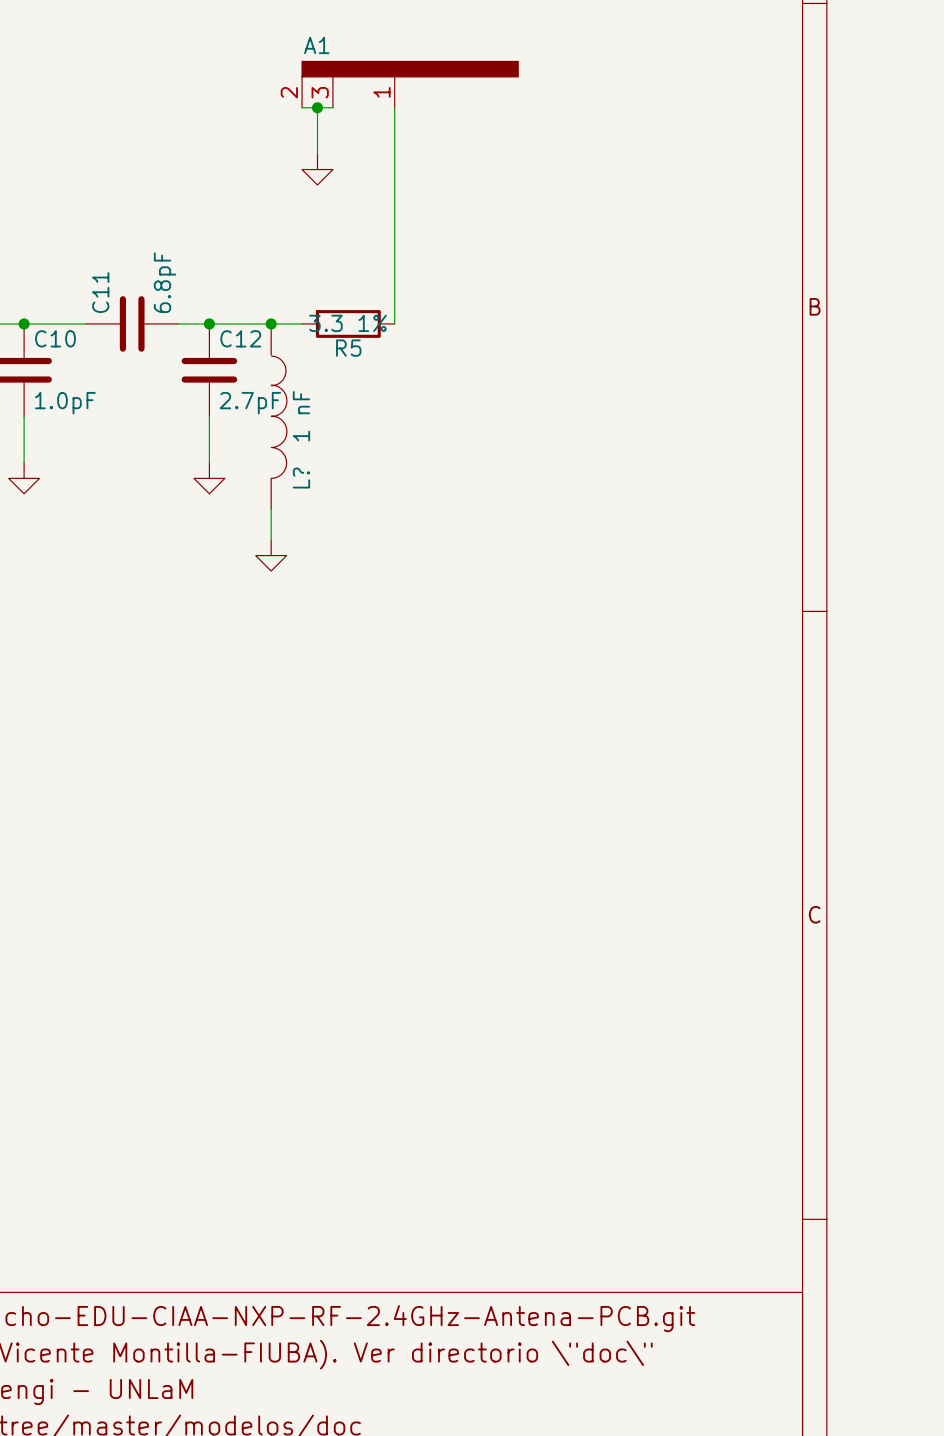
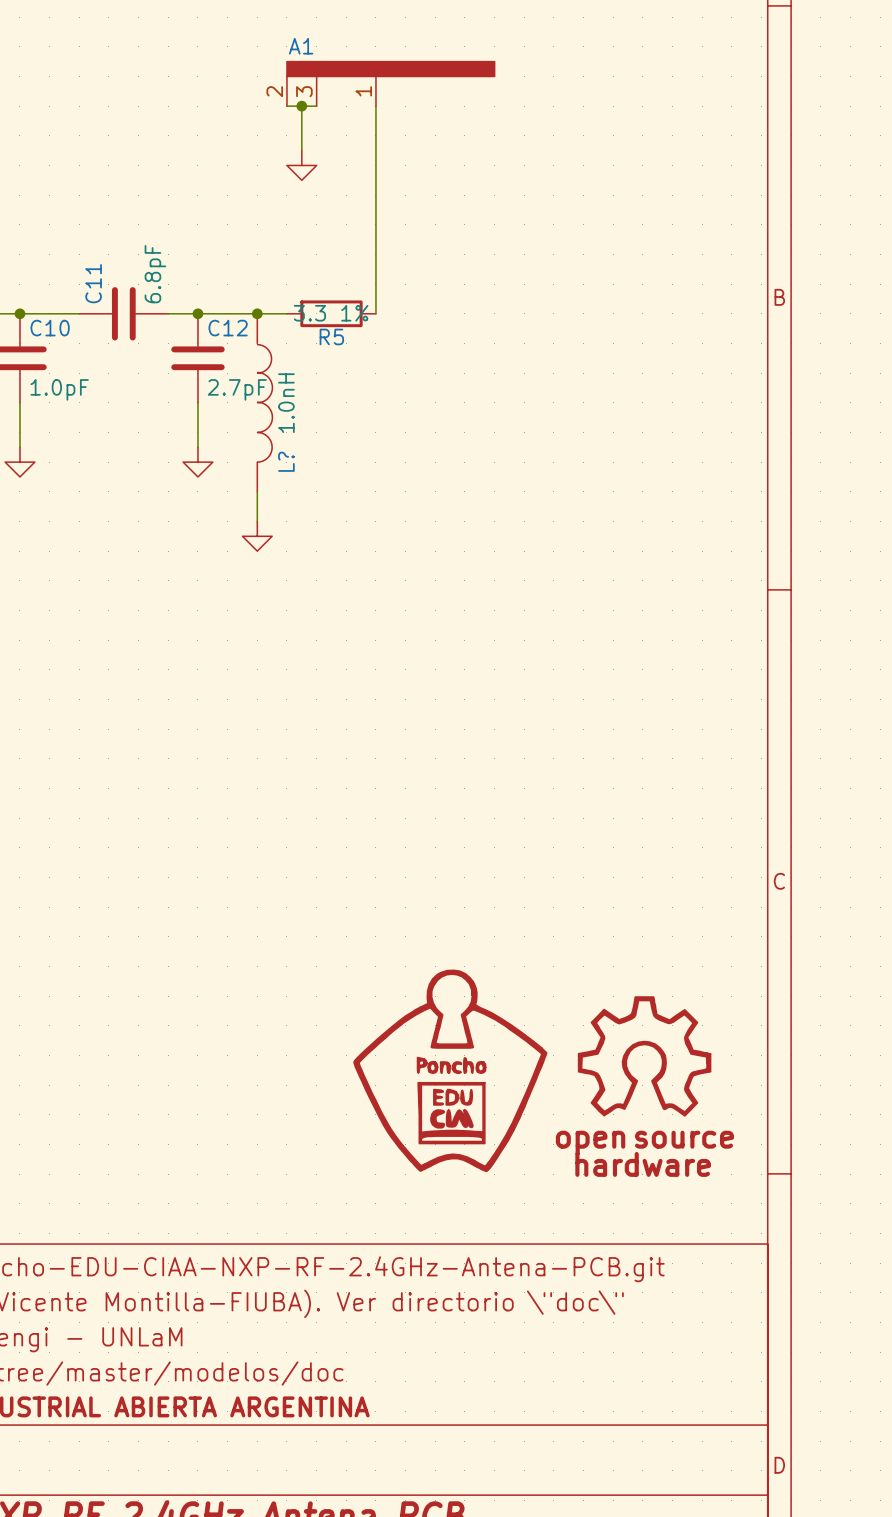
L? value: 1 nF (301, 416) -> 1.0nH (286, 403)
power symbol: none -> (644, 1056)
power symbol: none -> (450, 1070)

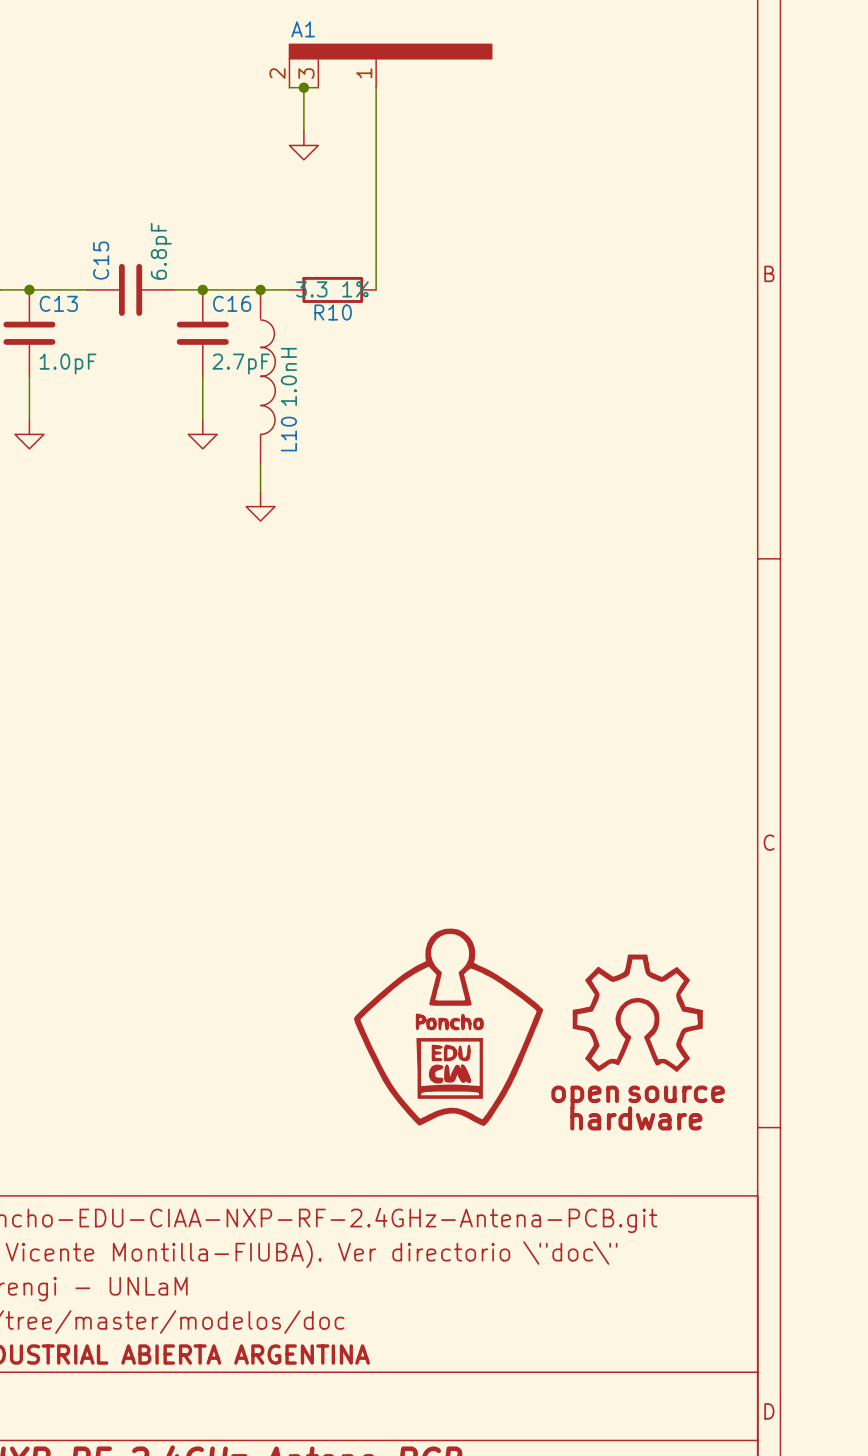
C11 name: C11 (93, 283) -> C15 (101, 260)
C10 name: C10 (50, 328) -> C13 (58, 303)
C12 name: C12 (228, 328) -> C16 (232, 303)
R5 name: R5 (331, 336) -> R10 (333, 312)
L? name: L? (286, 461) -> L10 (288, 434)

